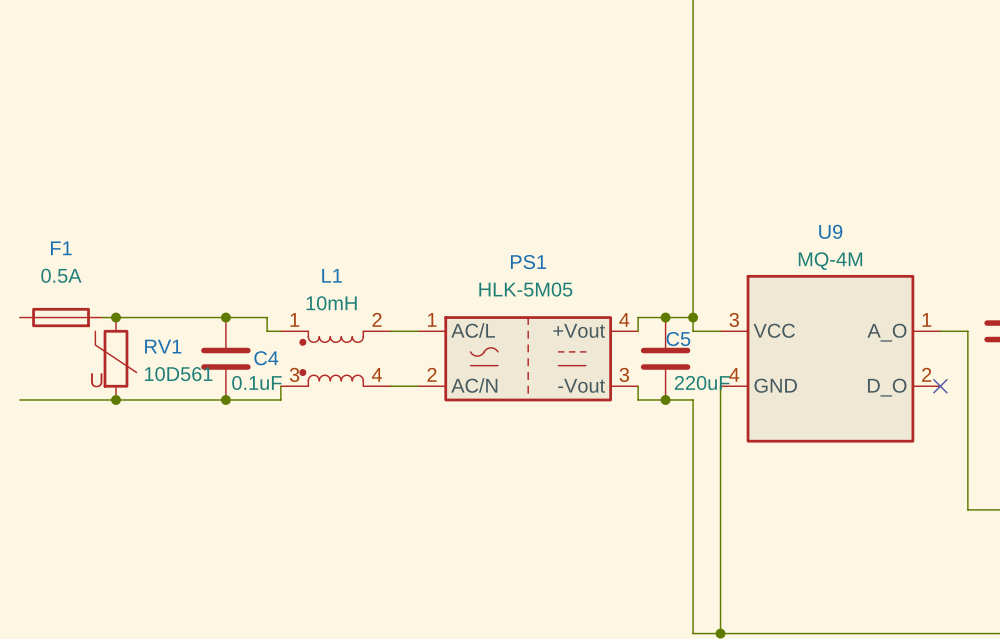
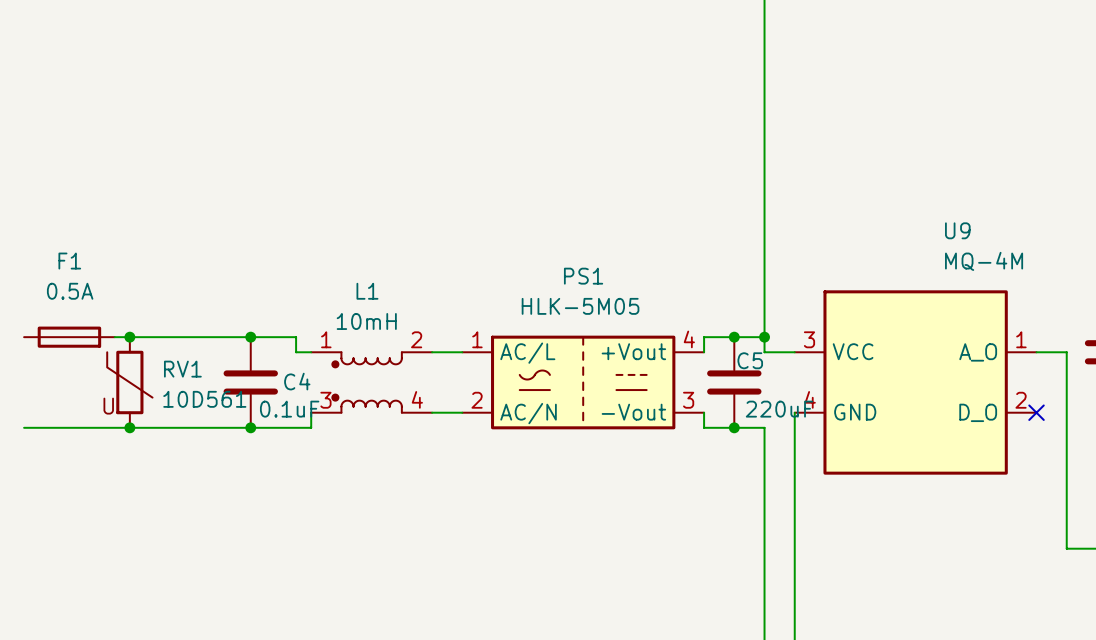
U9 name position: U9 (830, 231) -> U9 (957, 230)
U9 value position: MQ-4M (830, 261) -> MQ-4M (984, 261)

